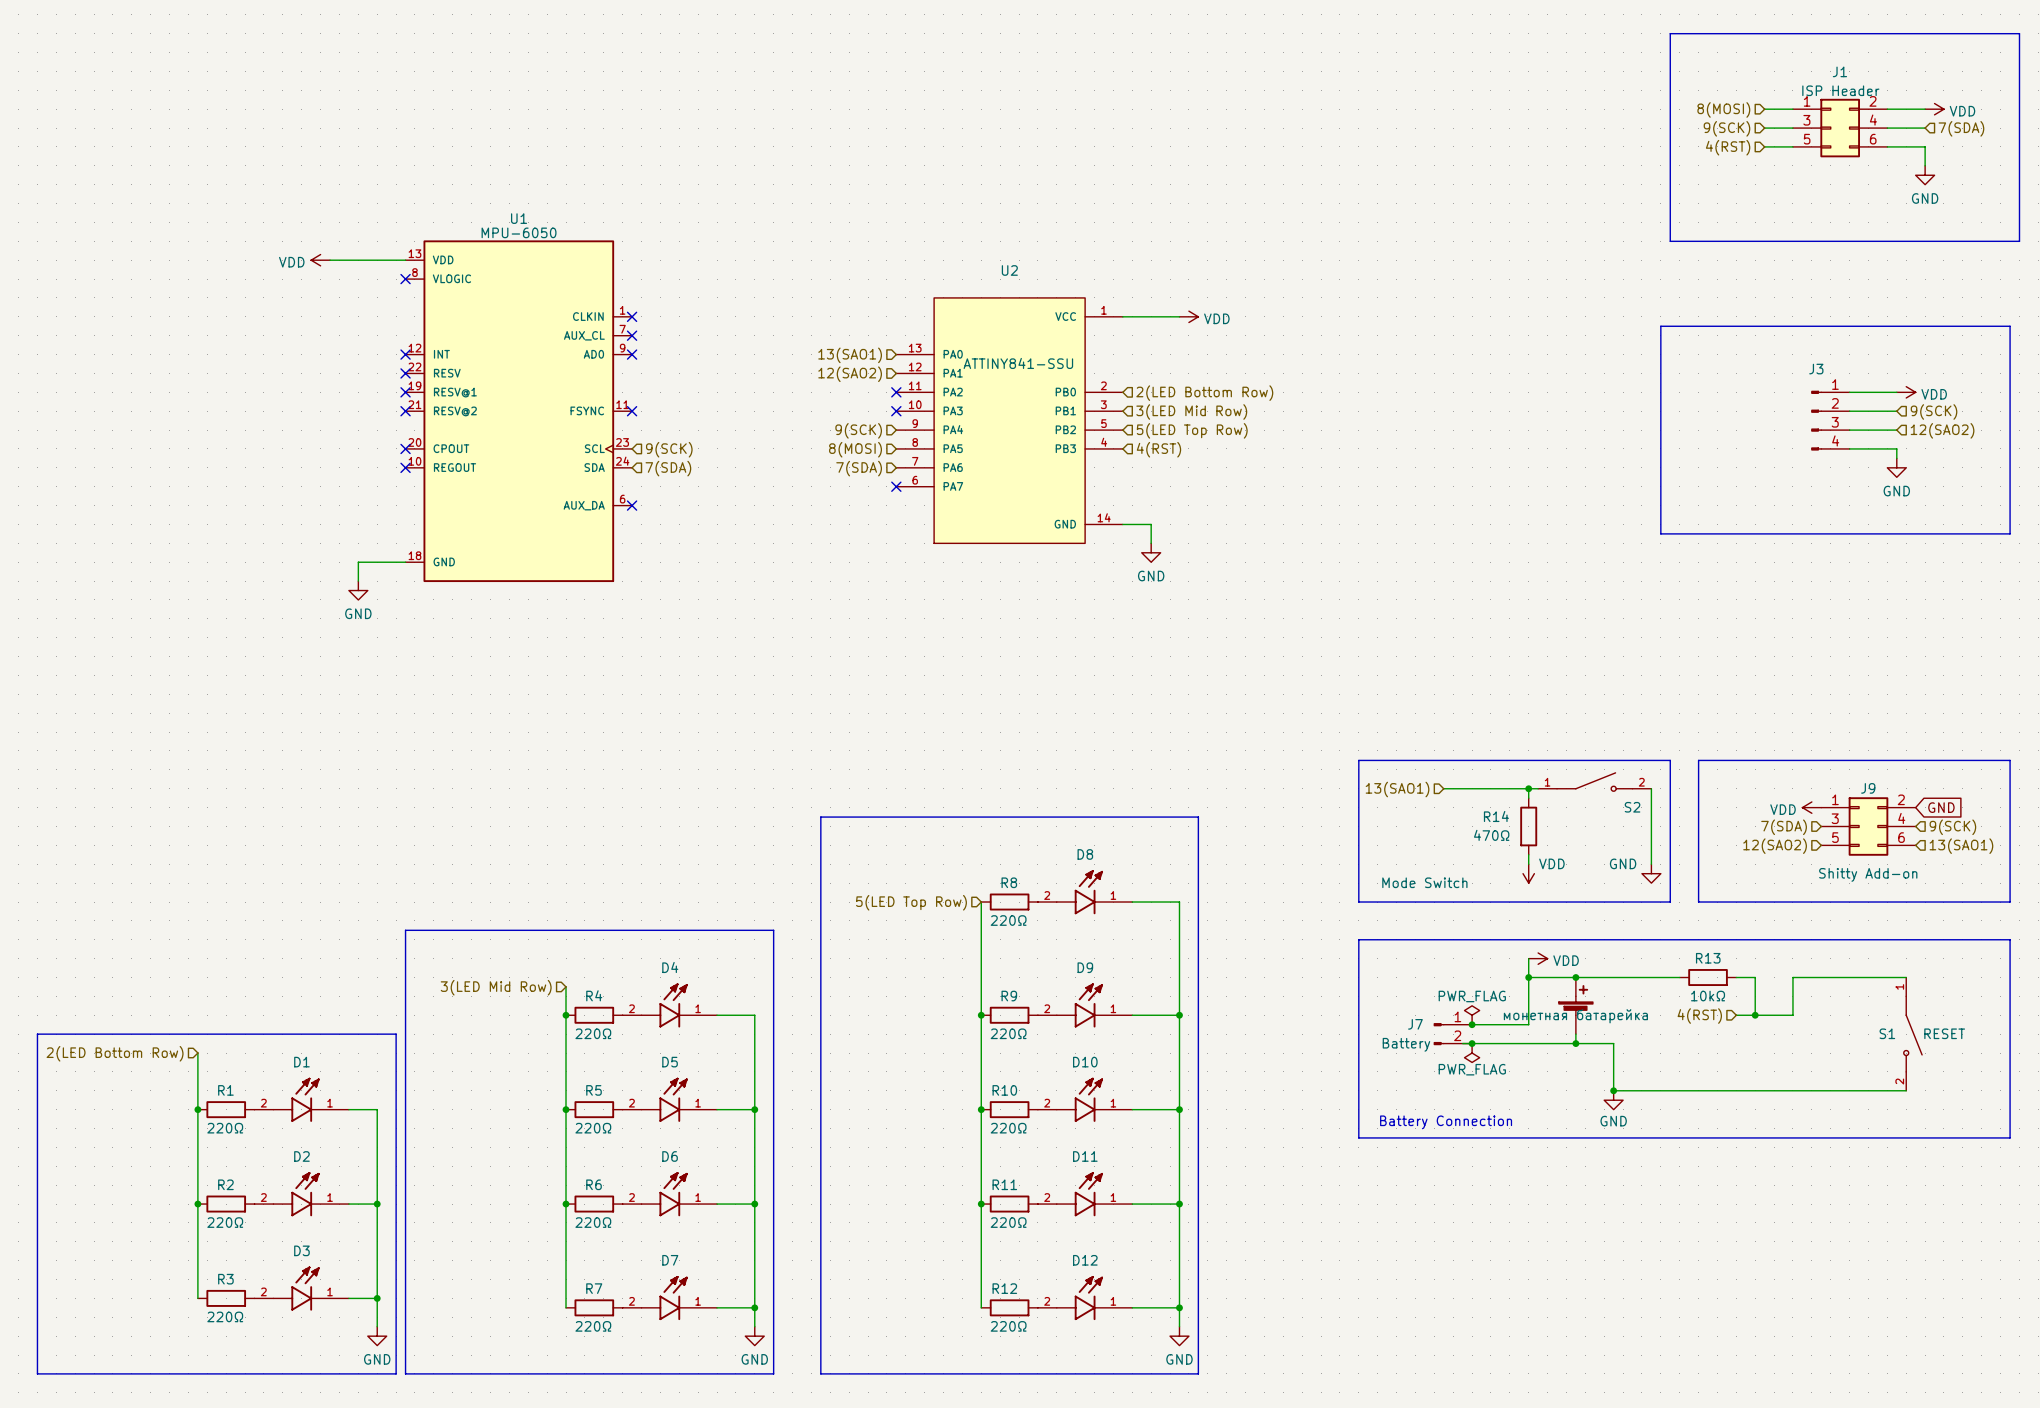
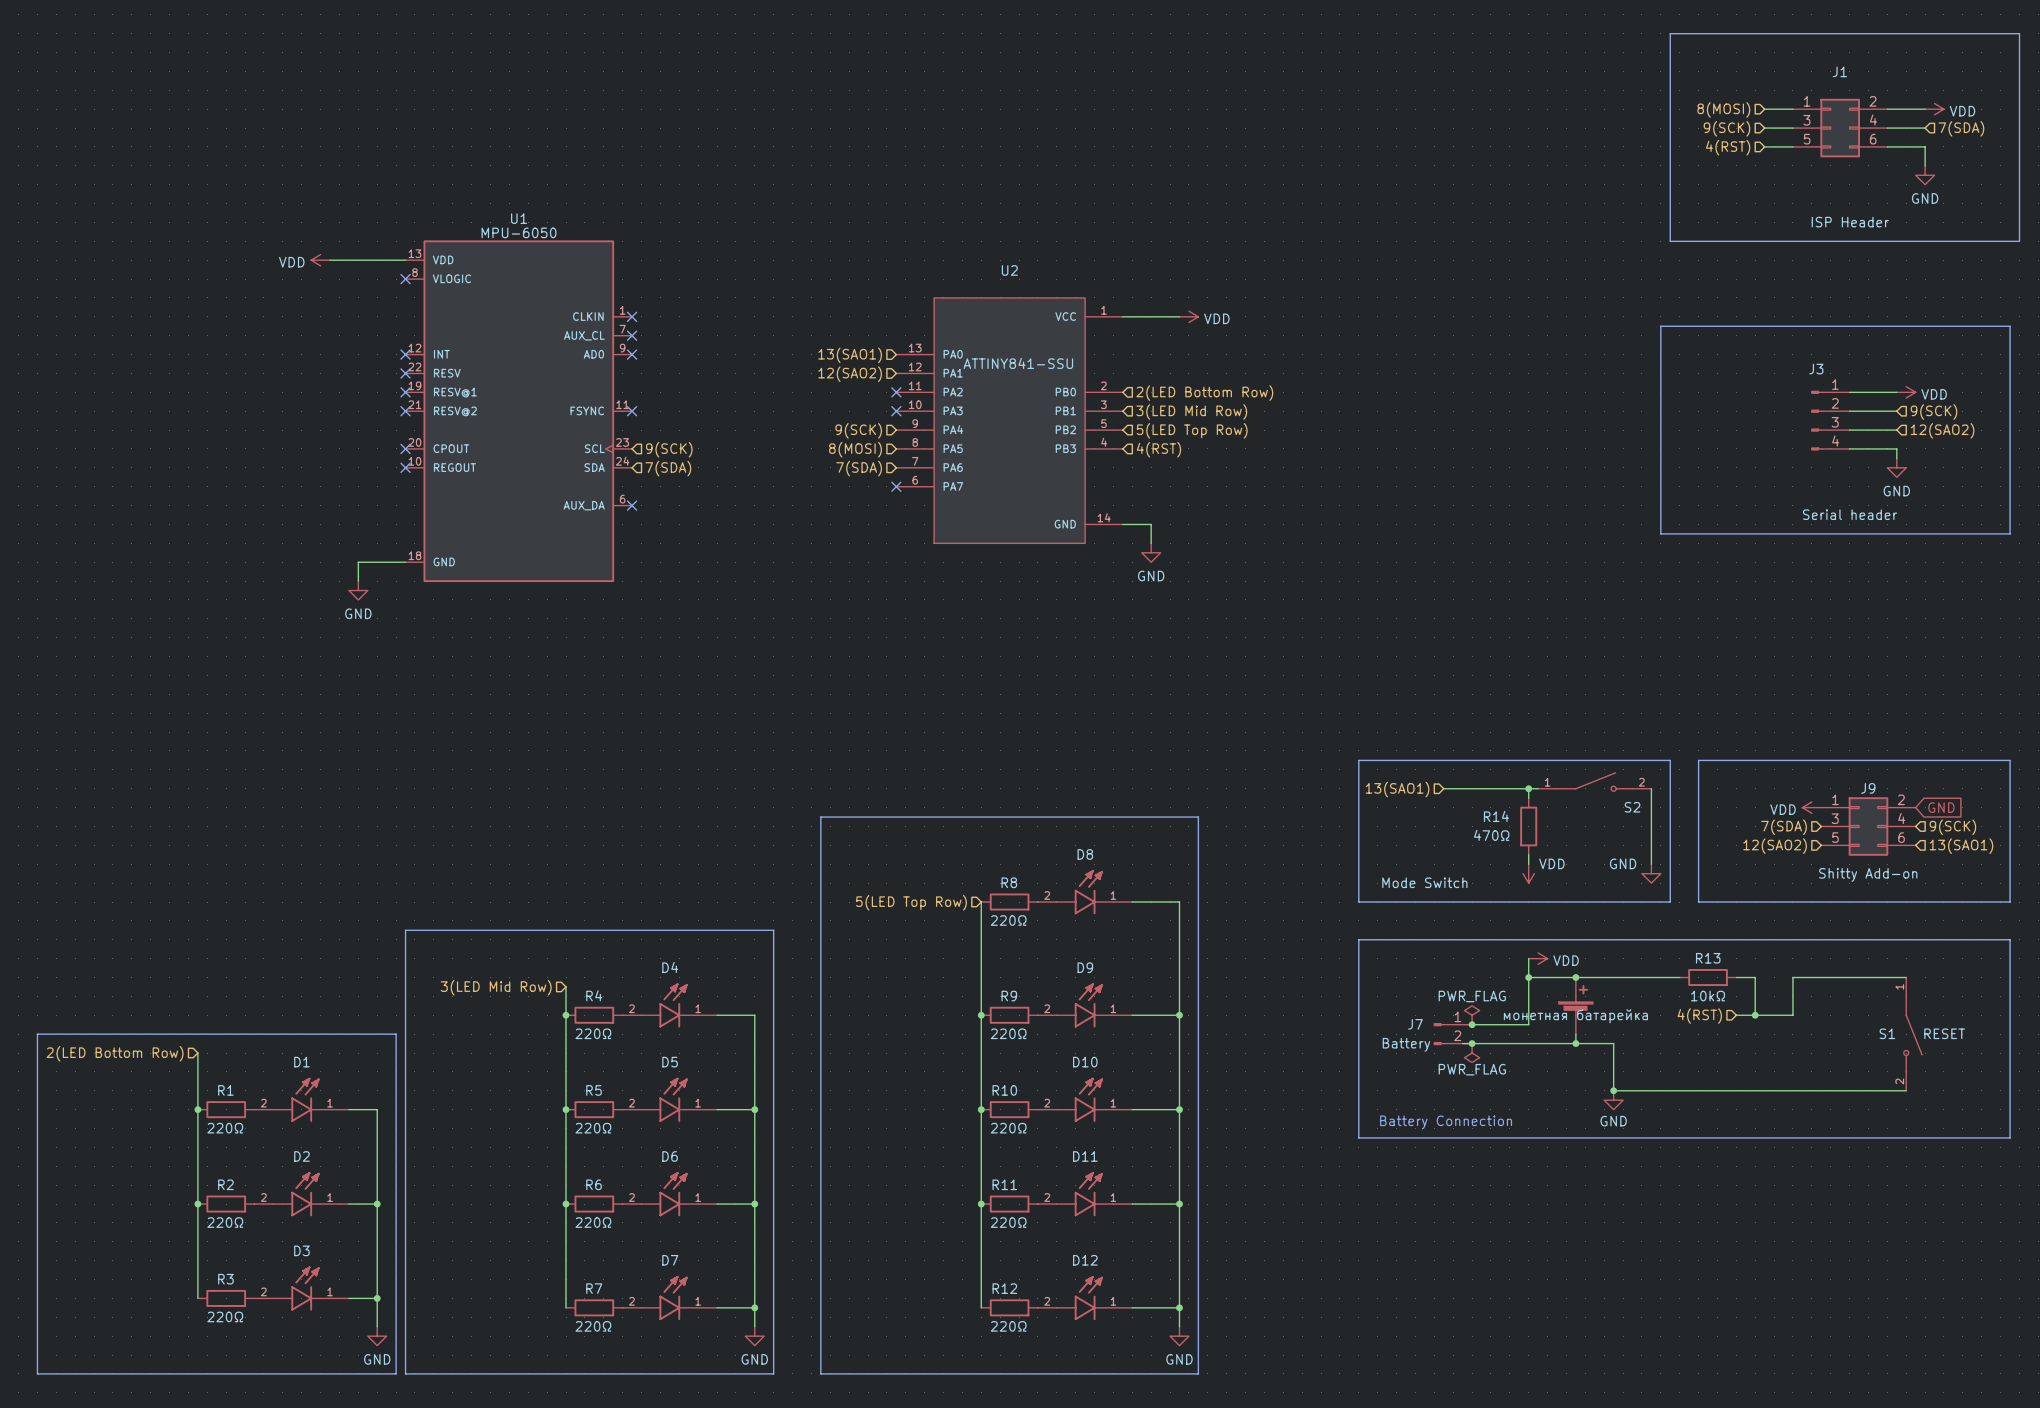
J1 value position: ISP Header (1840, 90) -> ISP Header (1850, 222)
J3 text: none -> Serial header (1850, 514)

